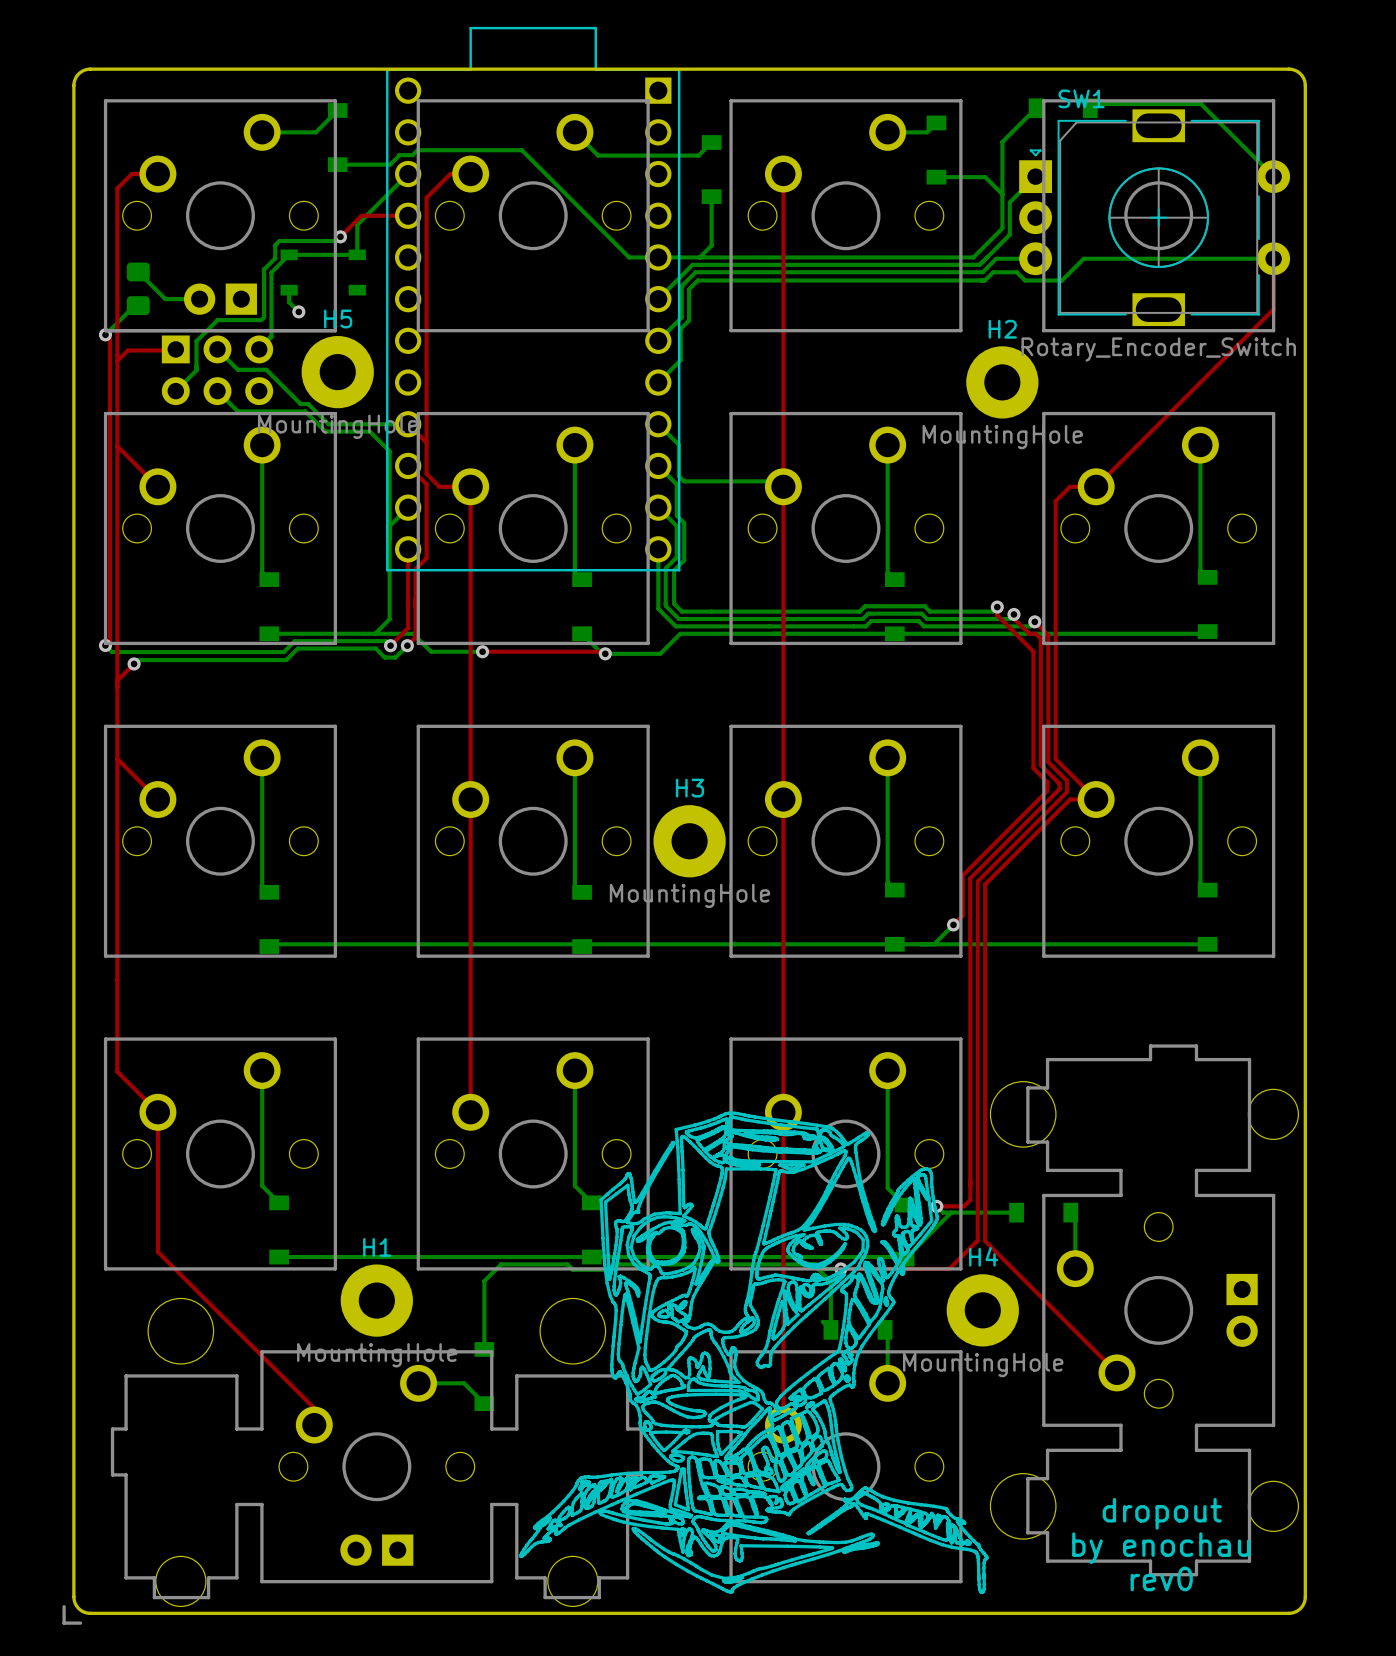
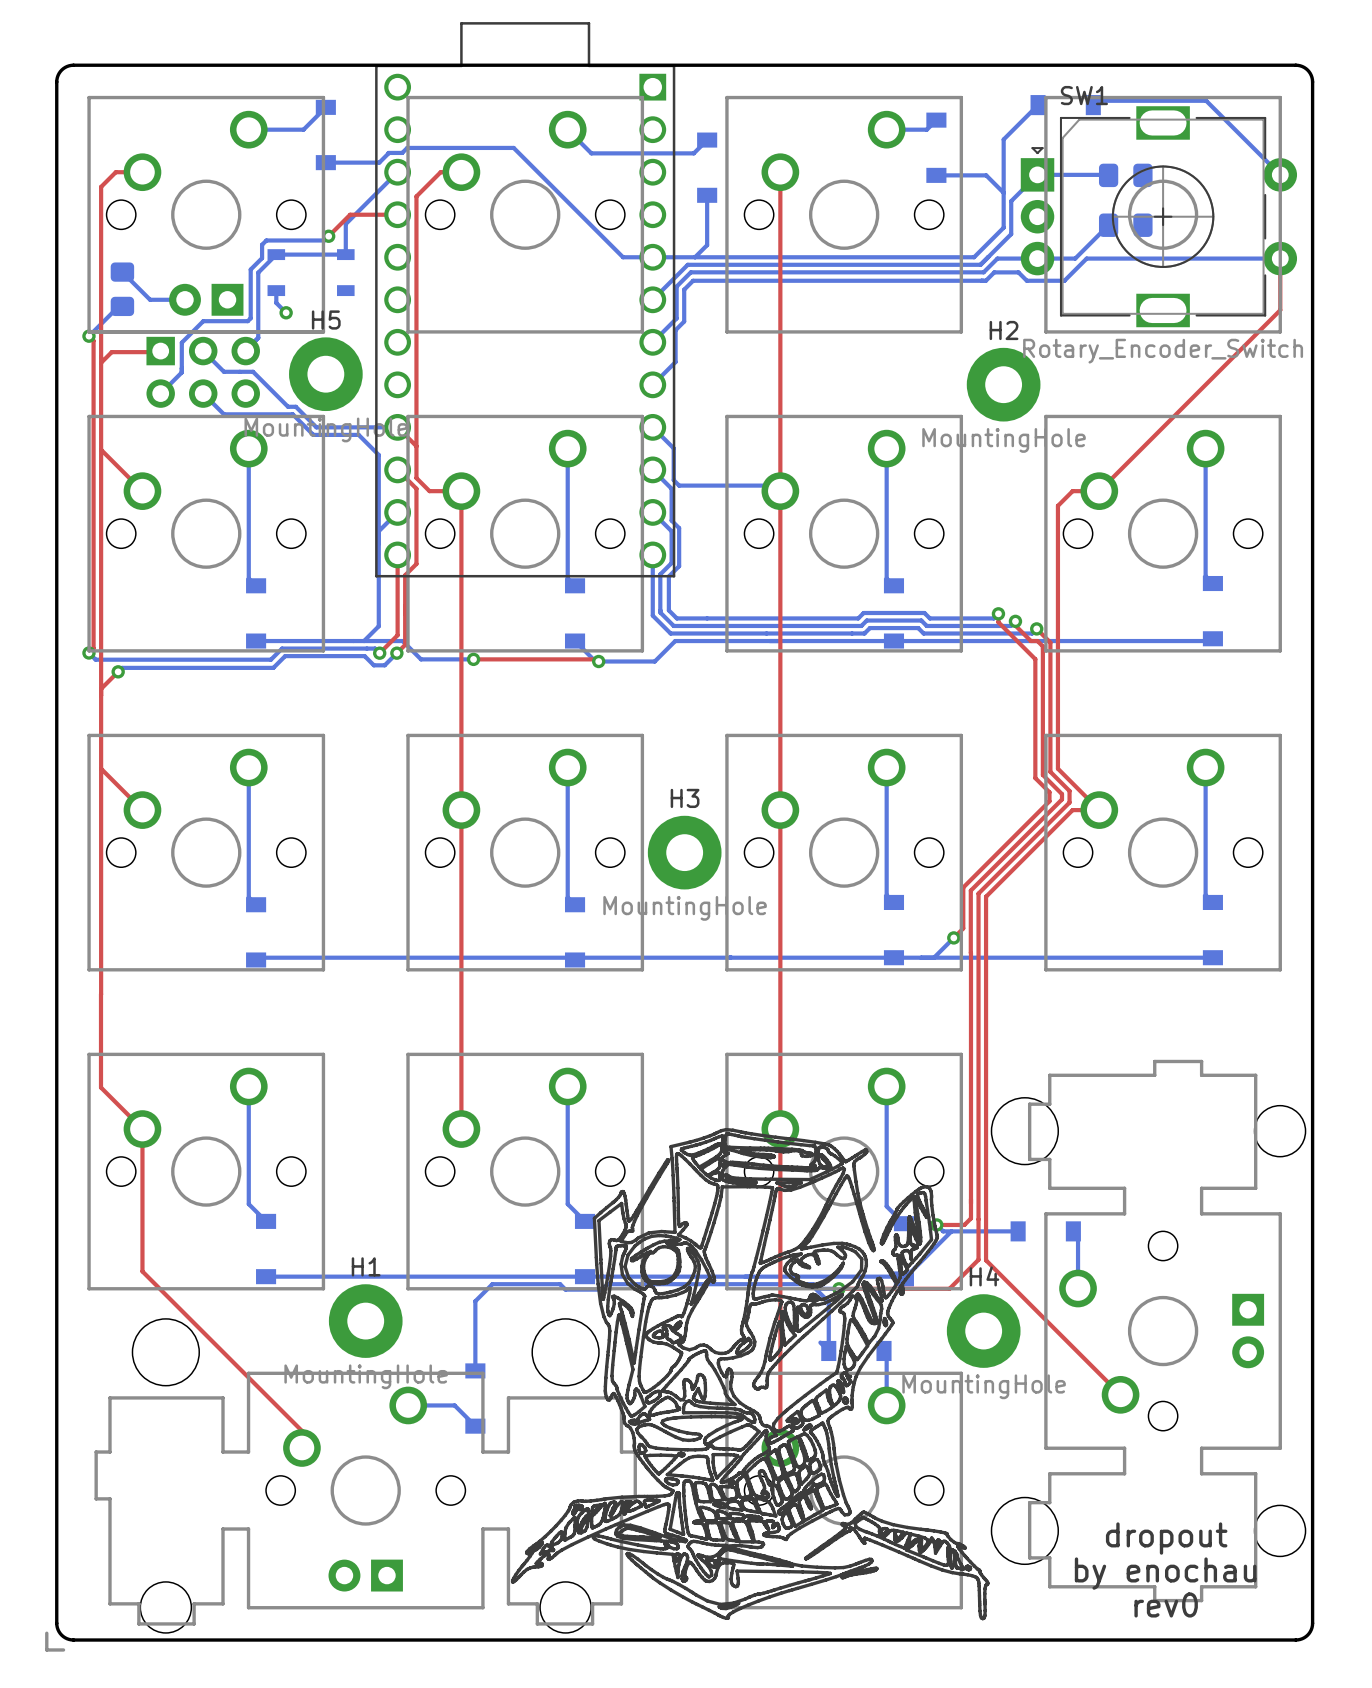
bottom track: none -> (1037, 174) (1108, 175)
part: none -> (1125, 175)
bottom track: none -> (1108, 225) (1075, 258) (1037, 258)
part: none -> (1125, 225)

